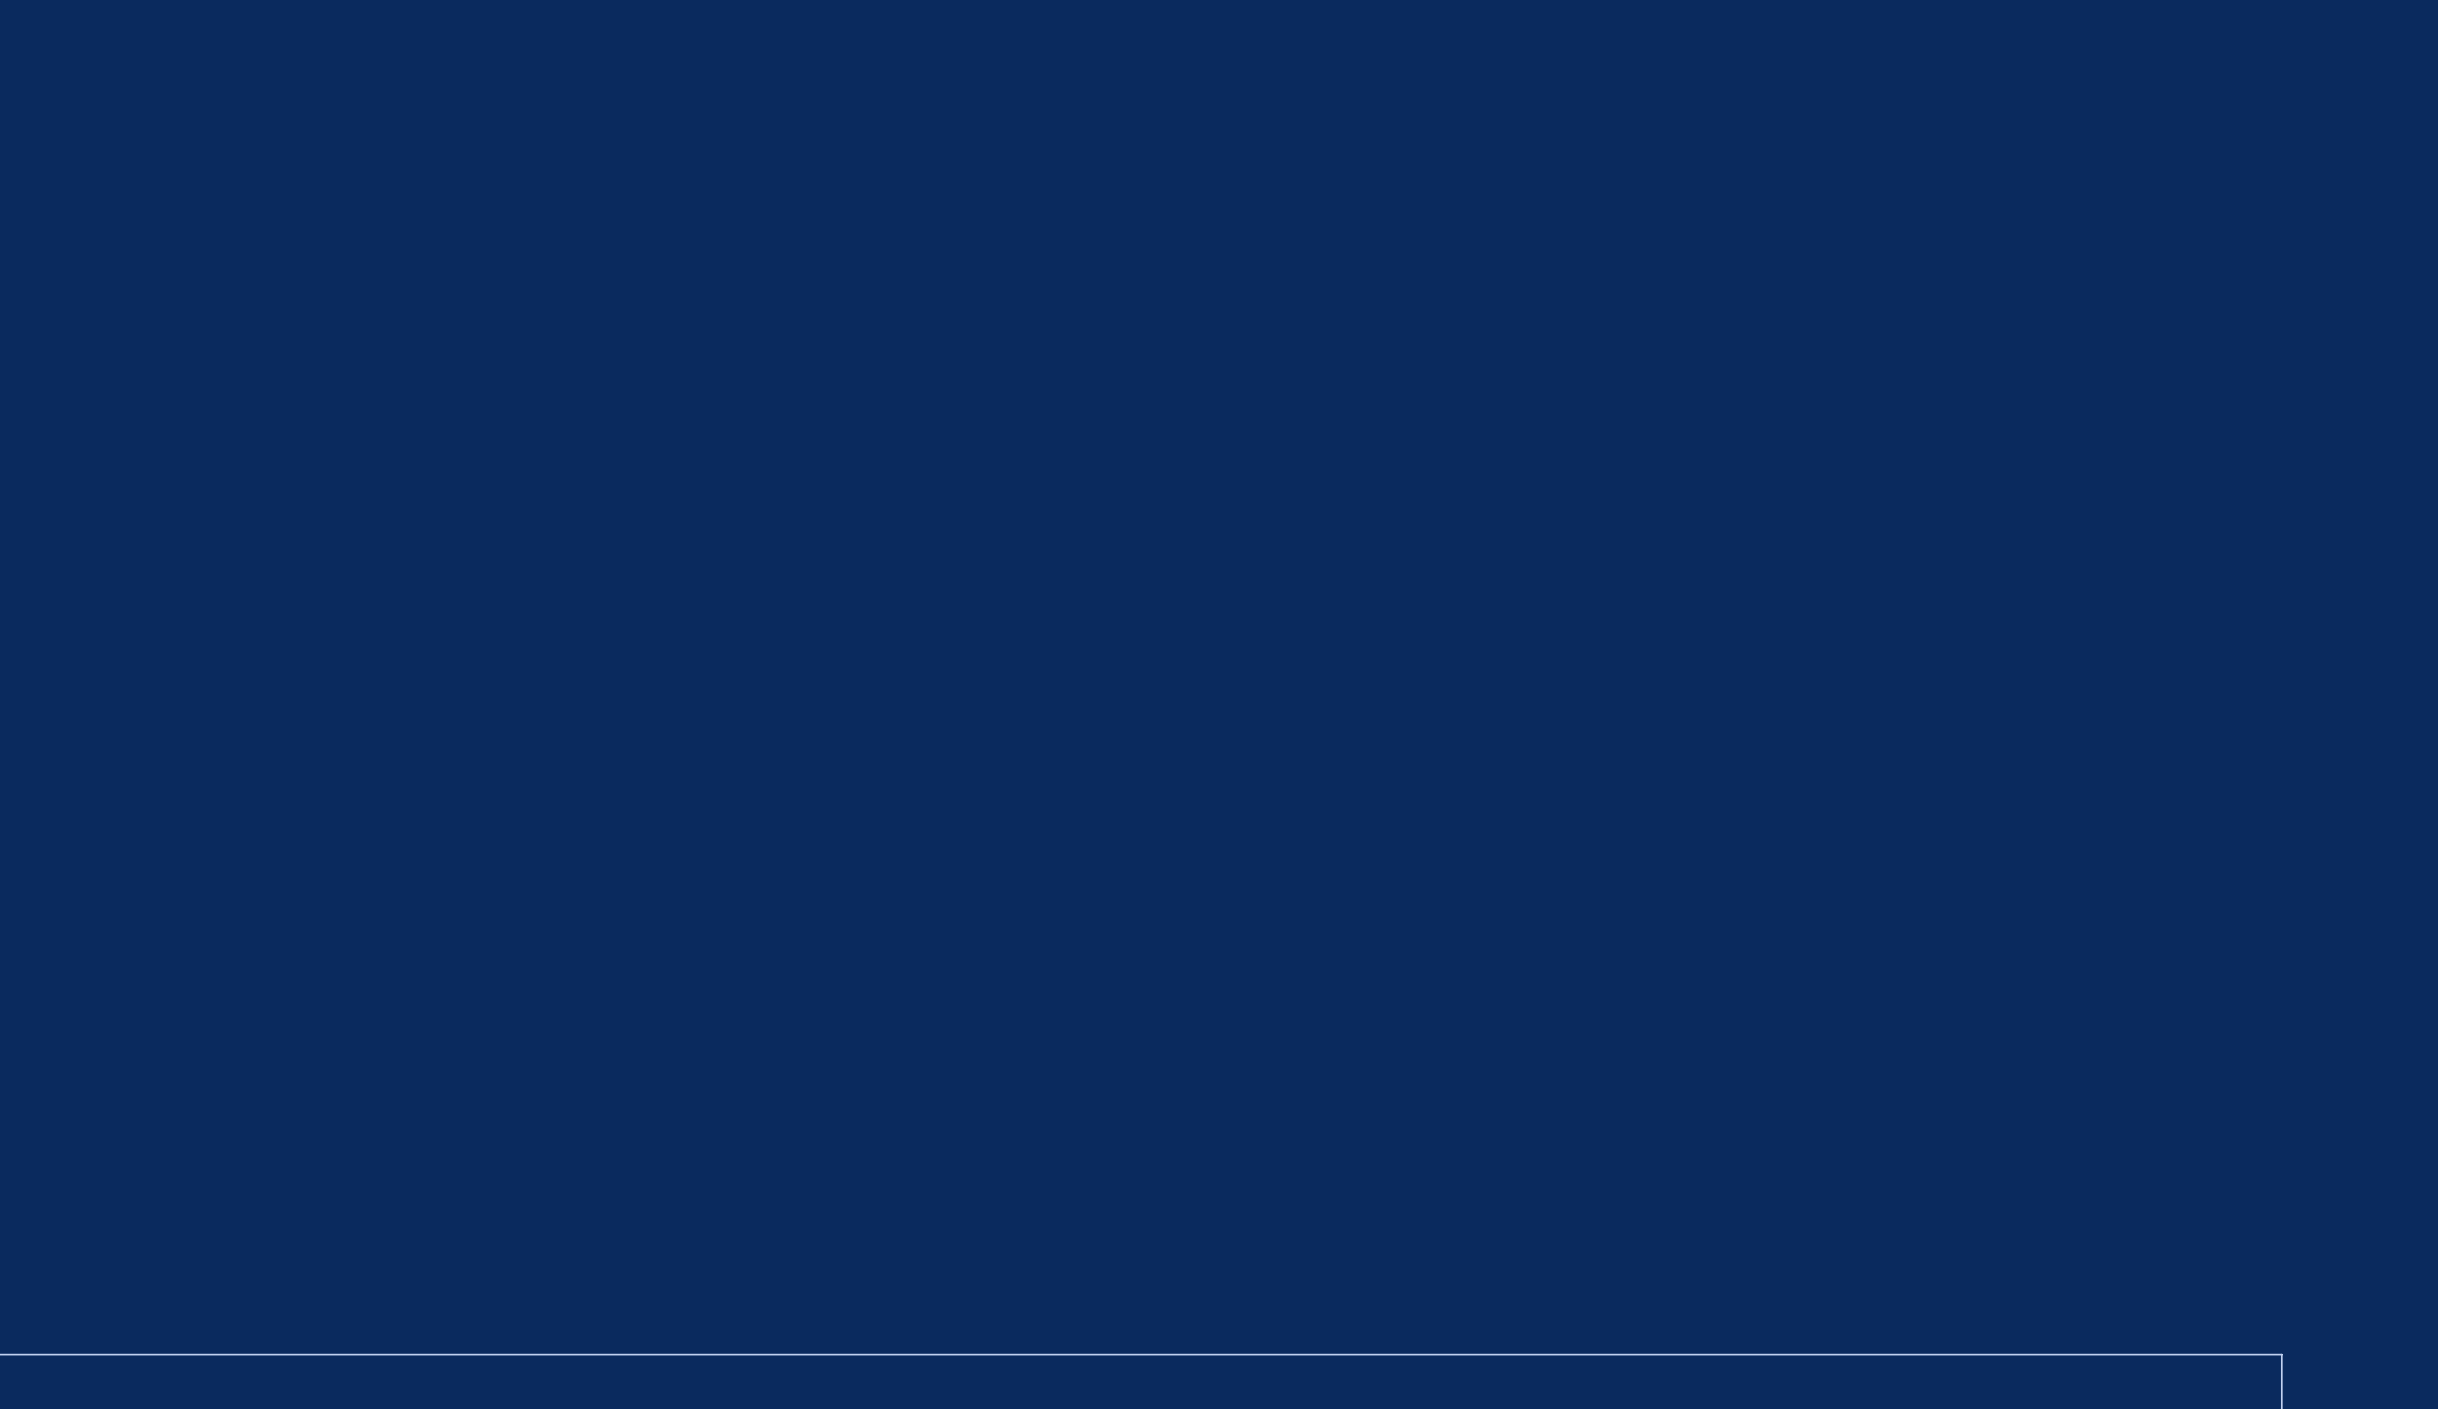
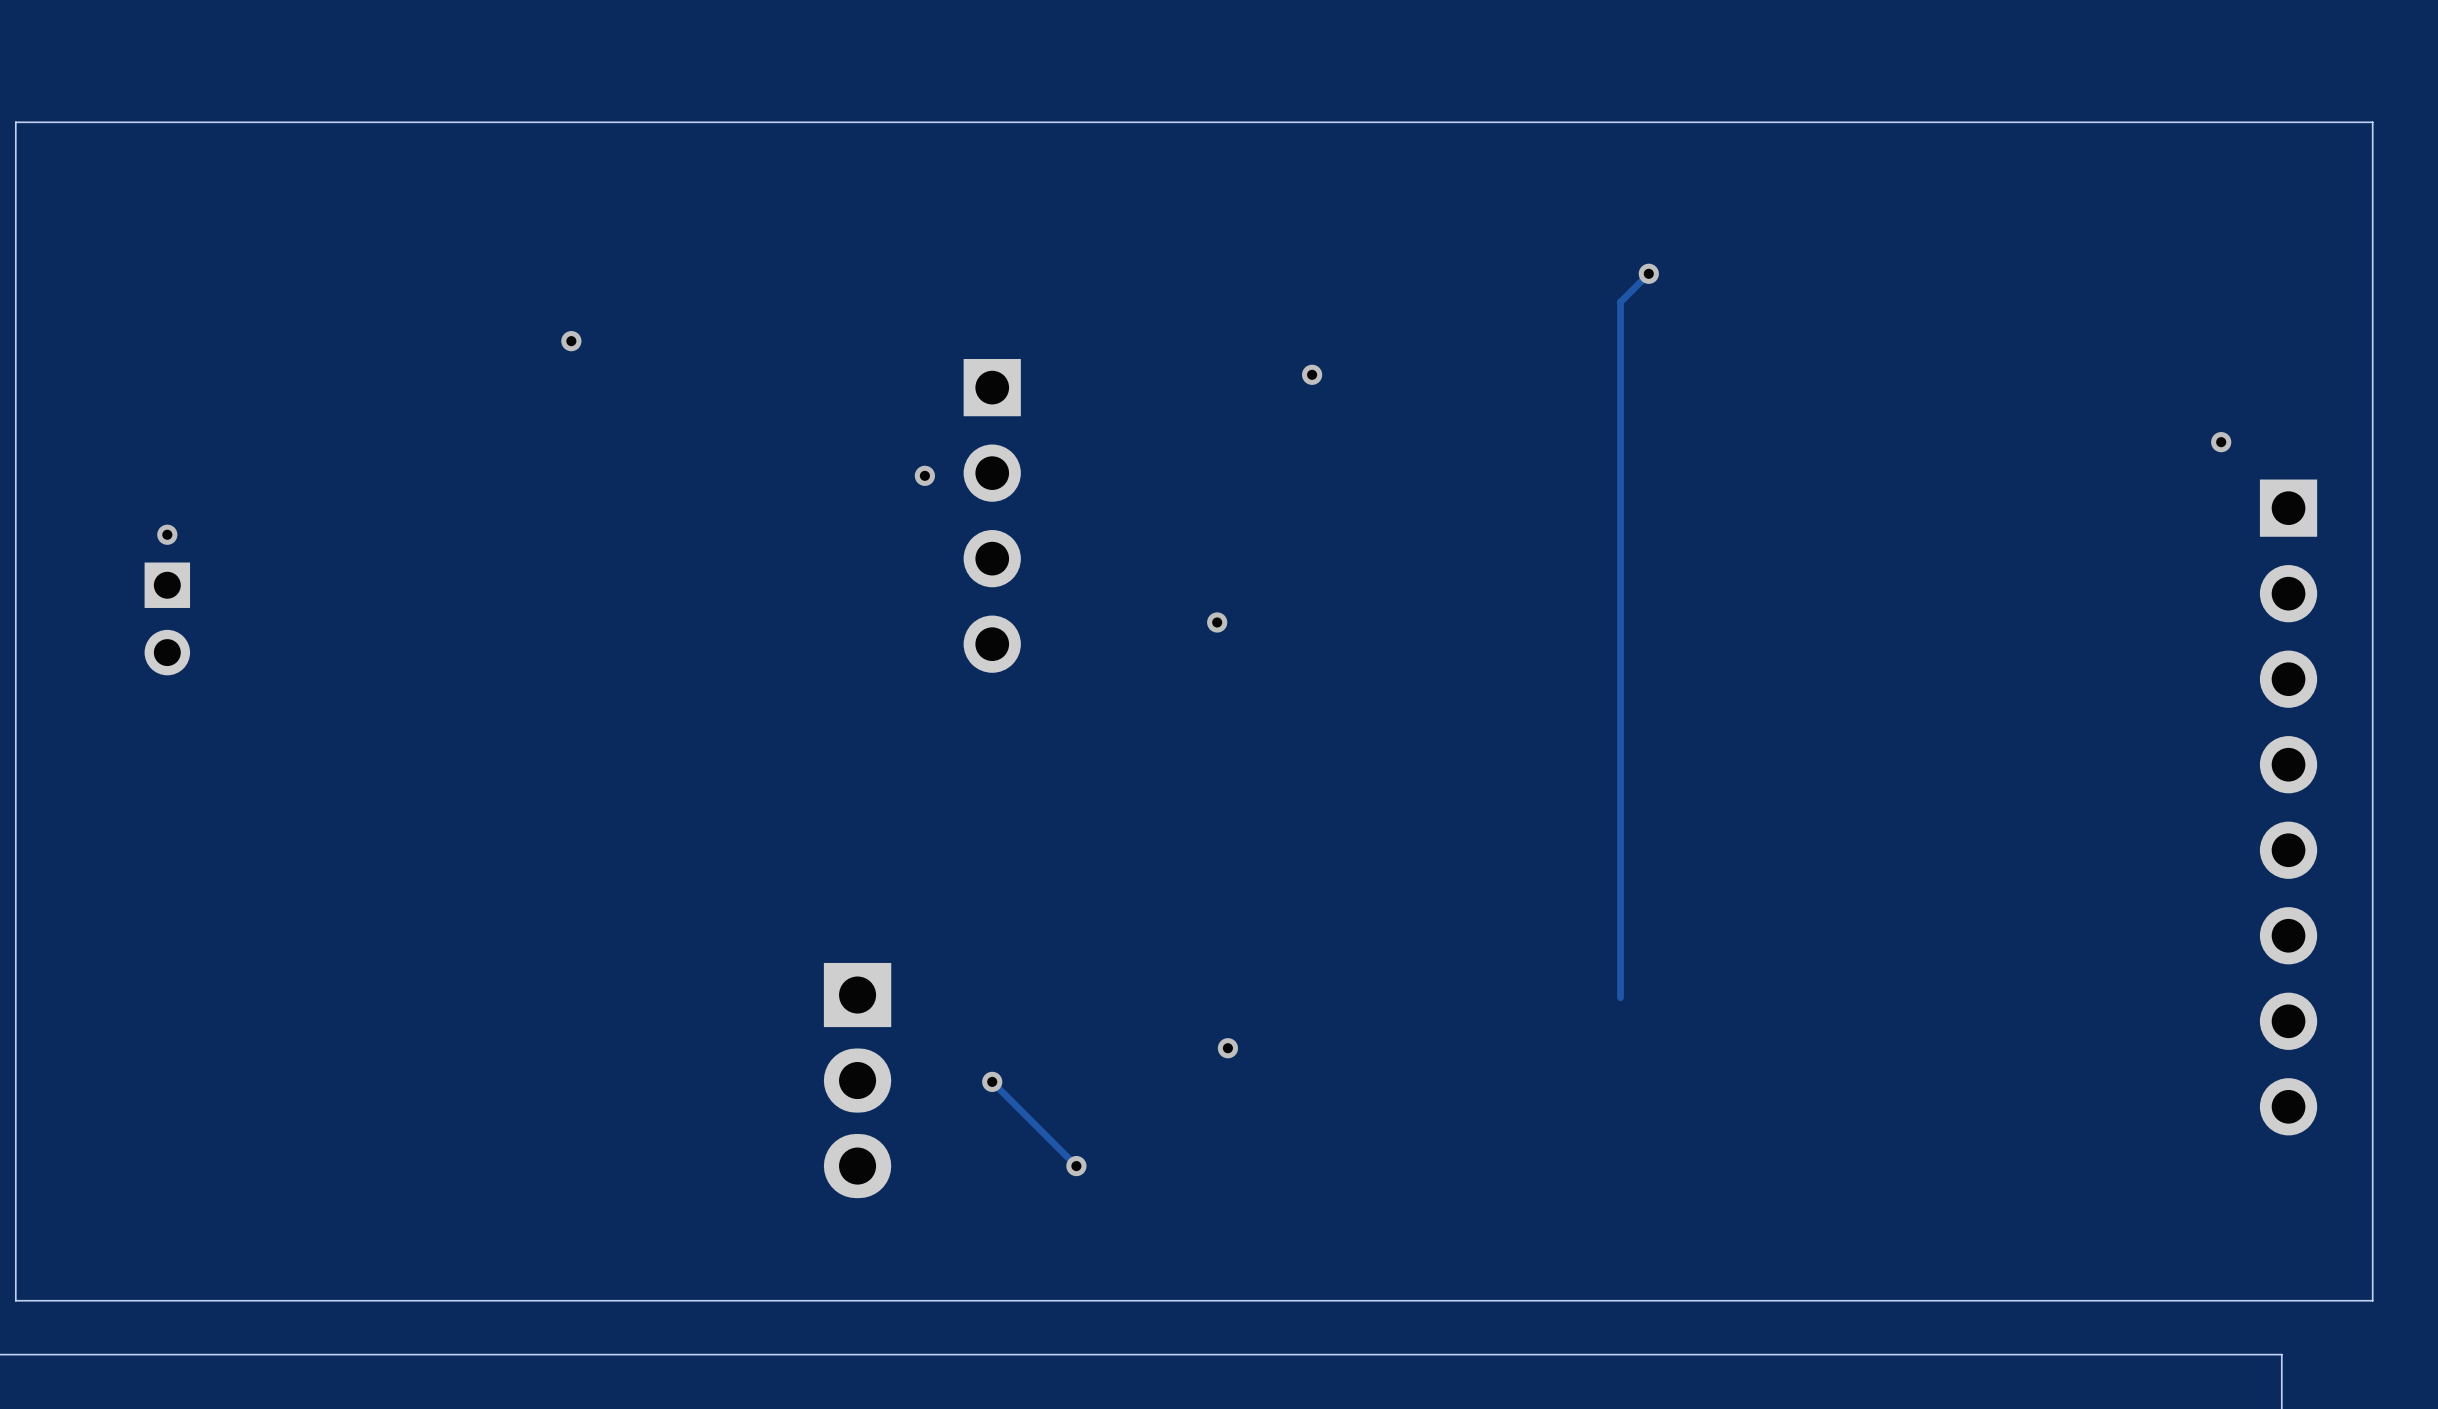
board edge: none -> (2372, 122) (15, 122) (15, 1300) (2372, 1300) (2372, 122)
track: none -> (1648, 273) (1620, 302) (1620, 997)
via: none -> (1648, 273)
via: none -> (571, 341)
via: none -> (1312, 374)
via: none -> (2221, 442)
via: none -> (924, 475)
part: none -> (992, 515)
via: none -> (167, 534)
part: none -> (167, 618)
via: none -> (1217, 622)
part: none -> (2288, 807)
via: none -> (1227, 1048)
part: none -> (857, 1080)
track: none -> (992, 1081) (1076, 1166)
via: none -> (992, 1081)
via: none -> (1076, 1166)

